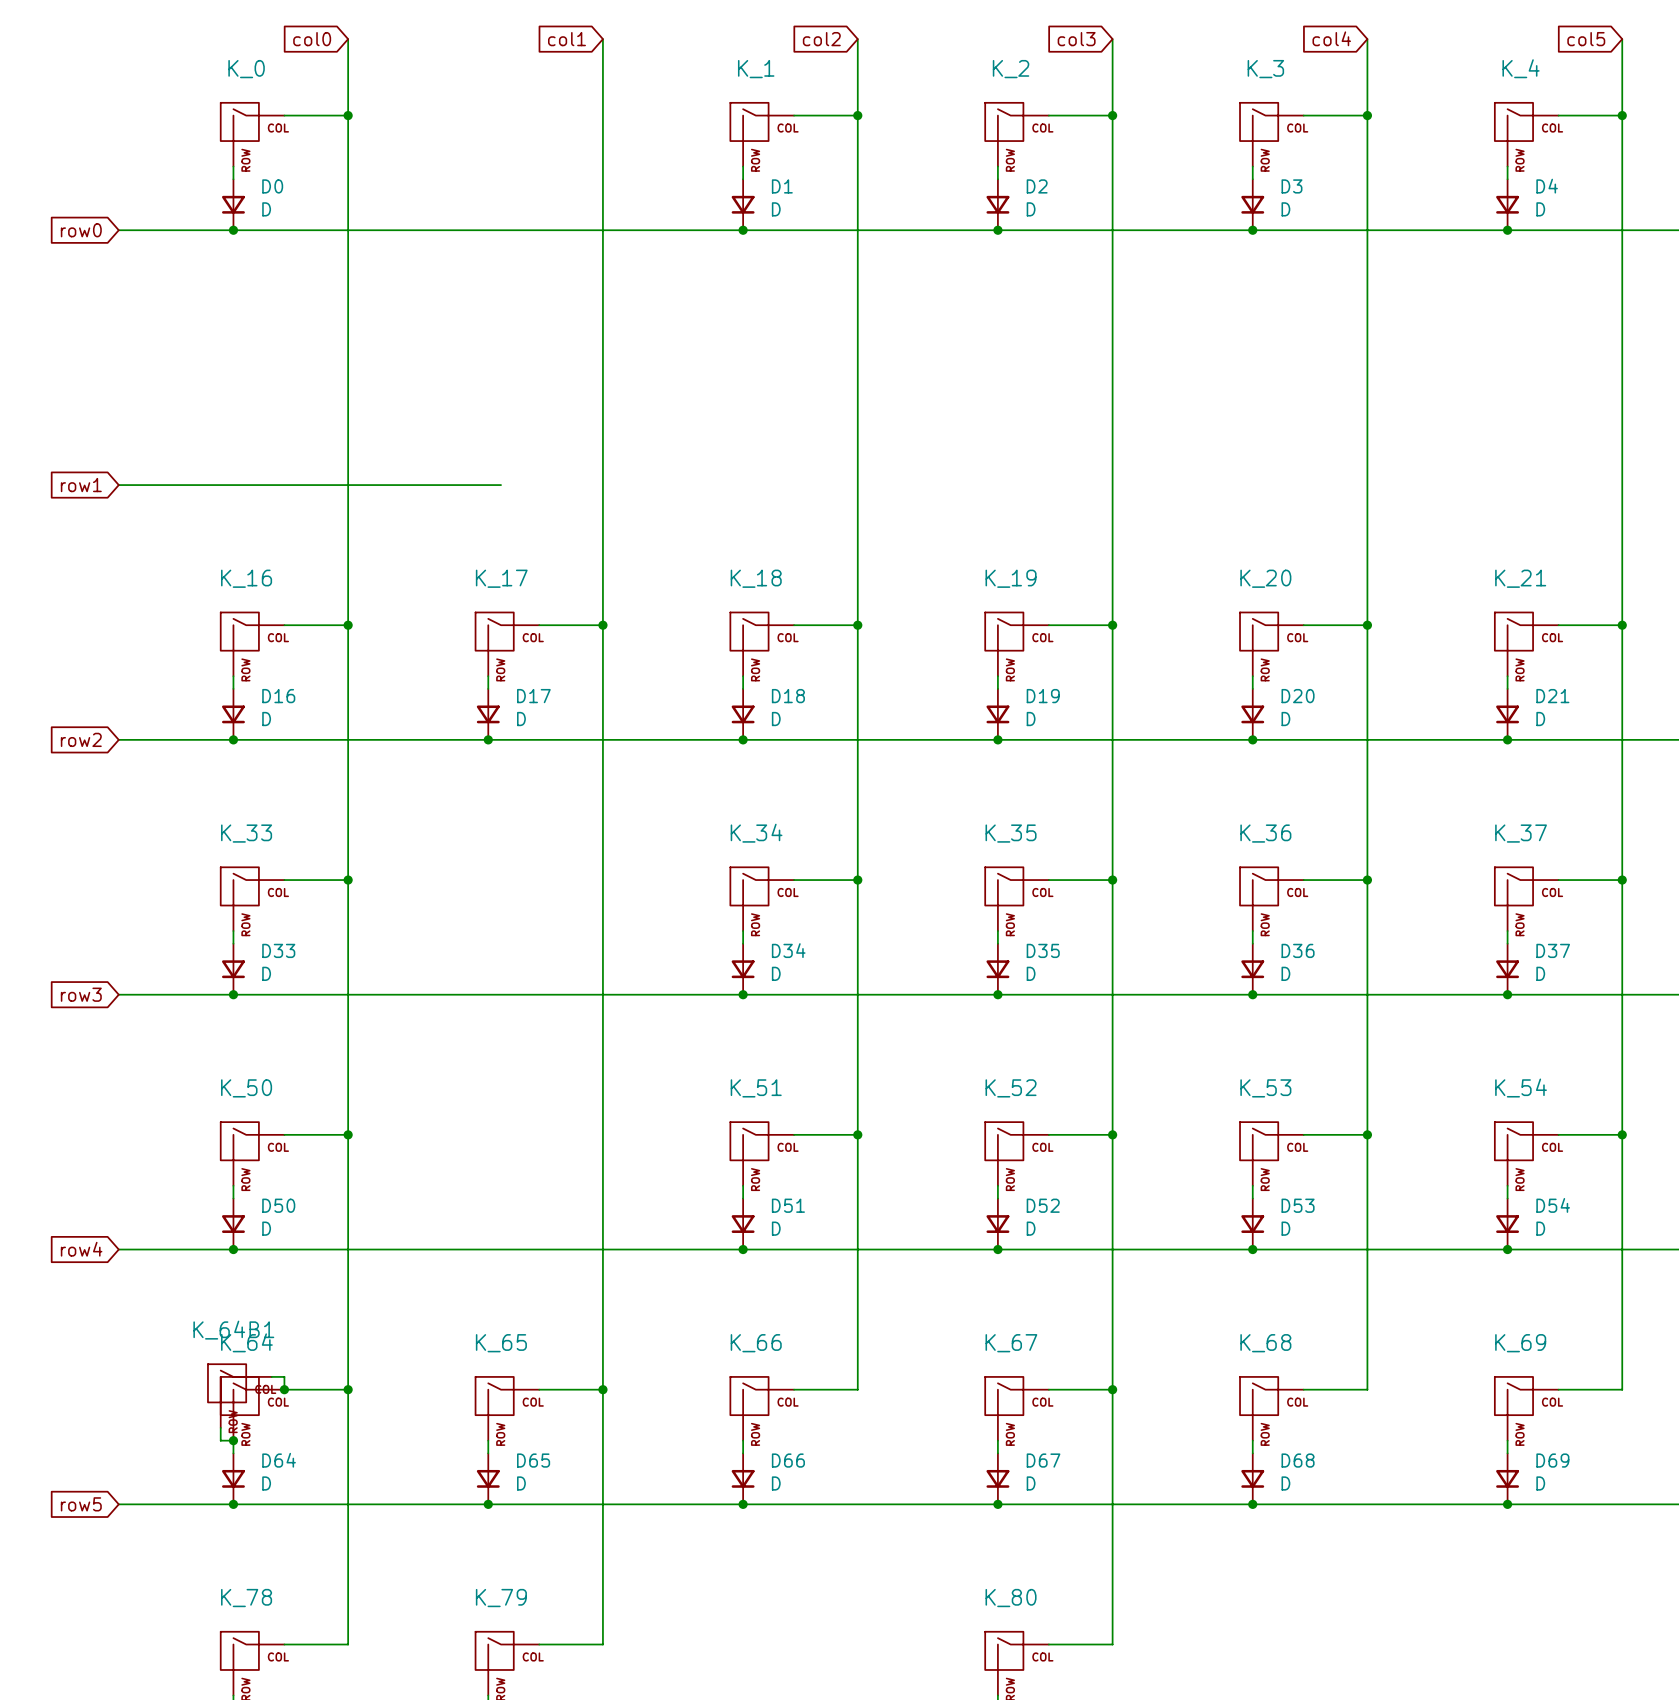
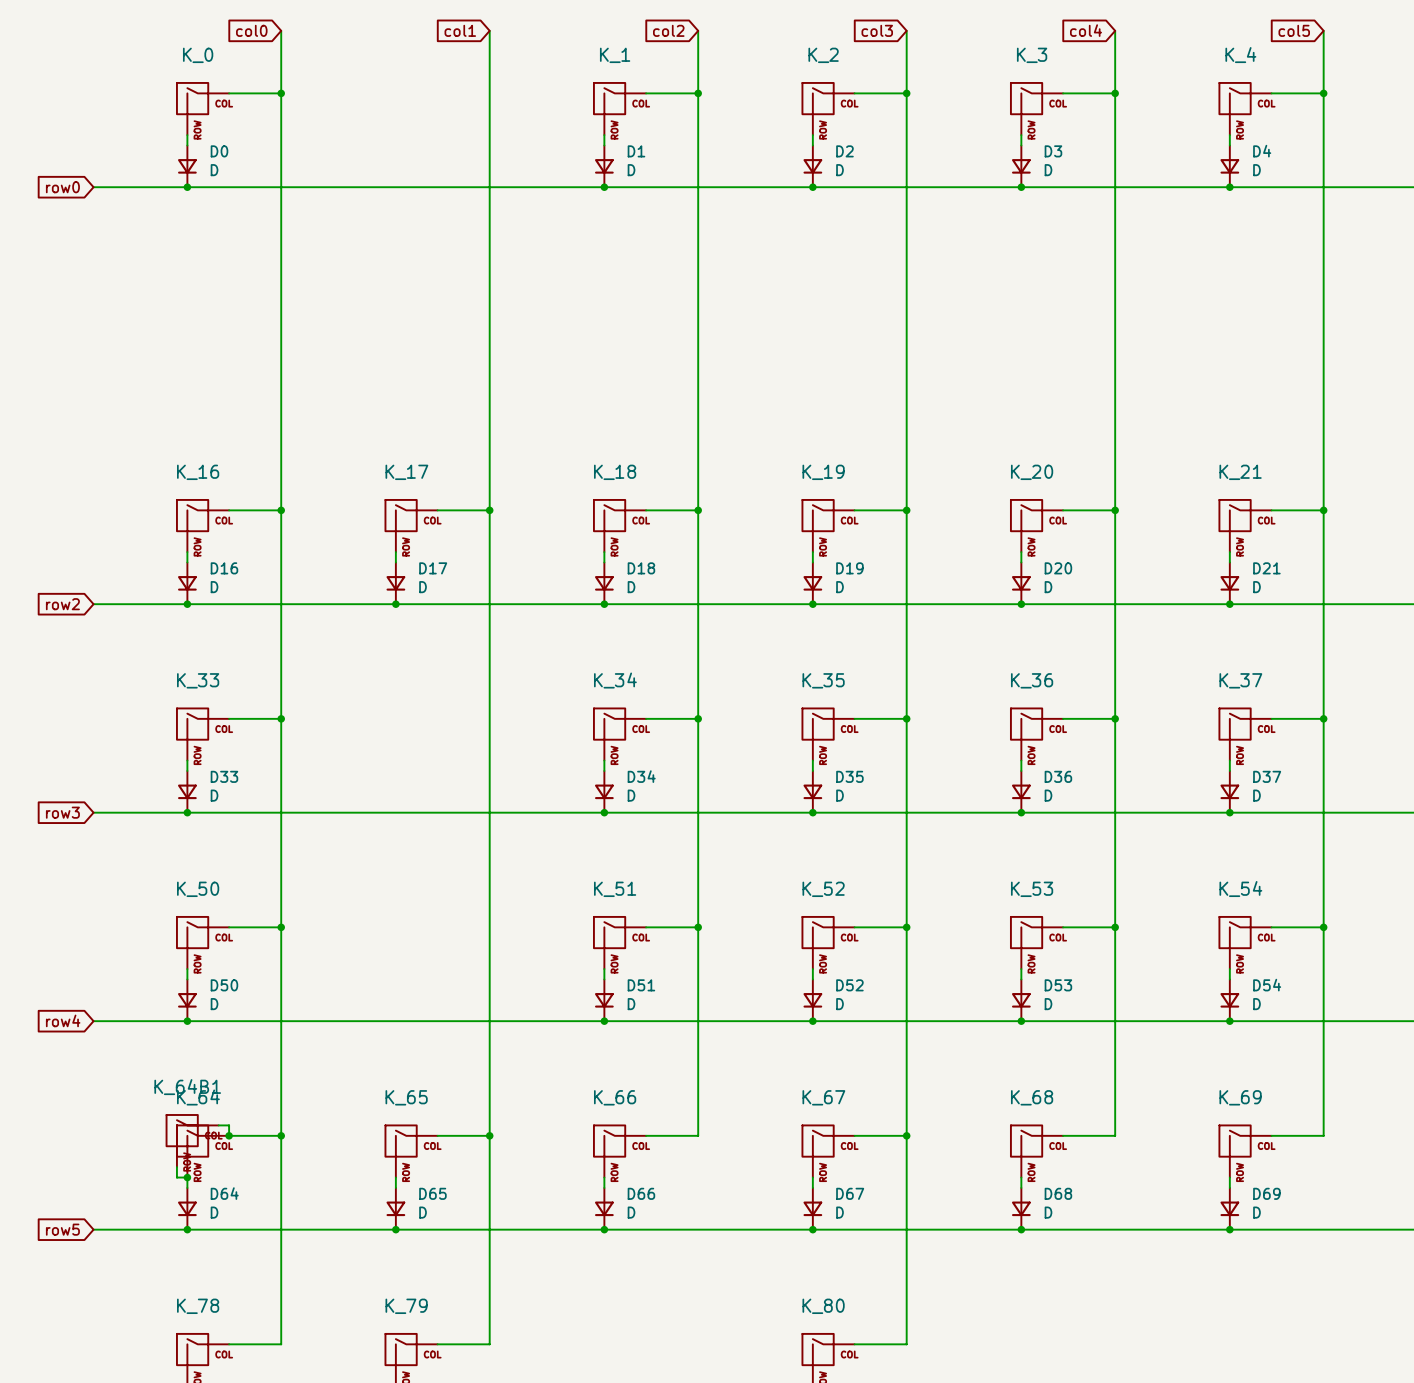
global label: row1 (81, 485) -> none
wire: (118, 485) (501, 485) -> none

